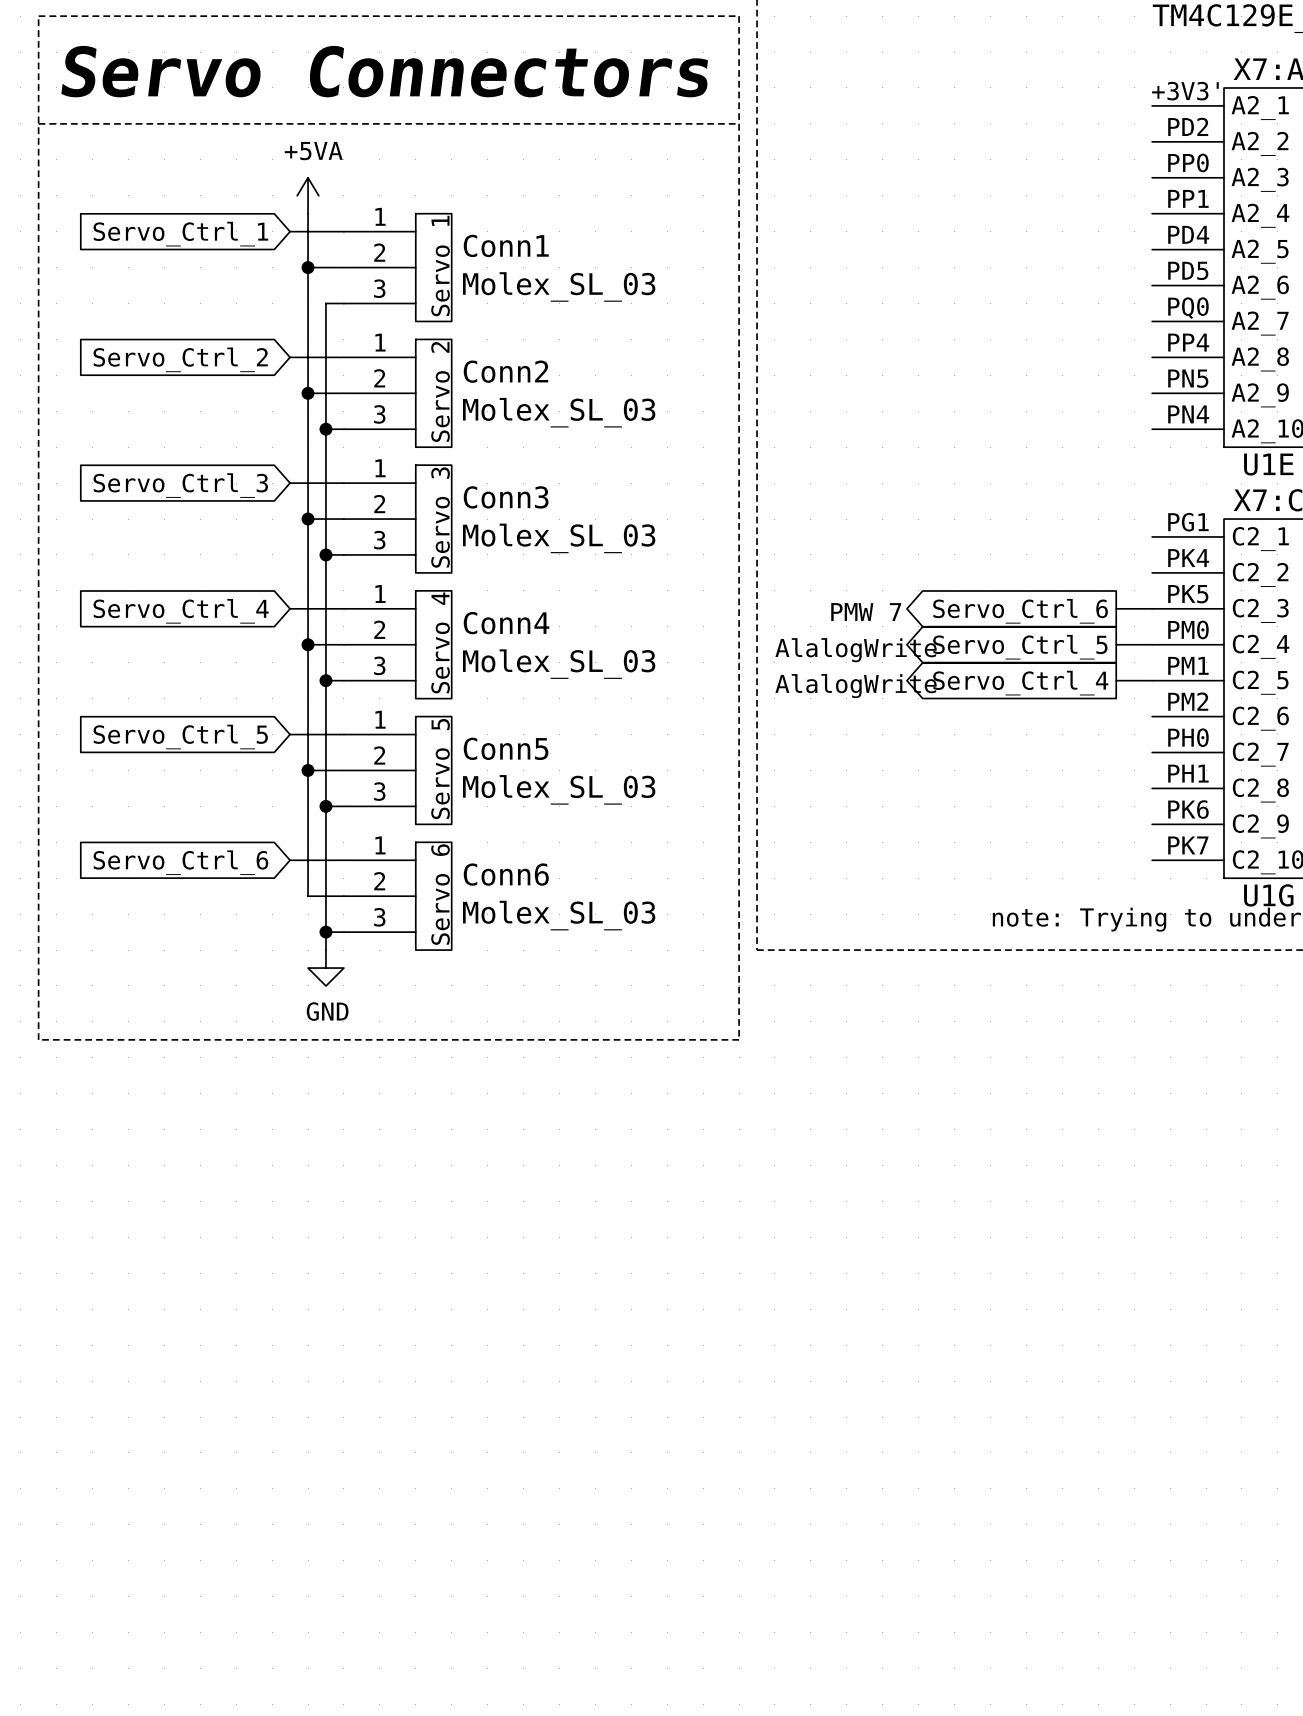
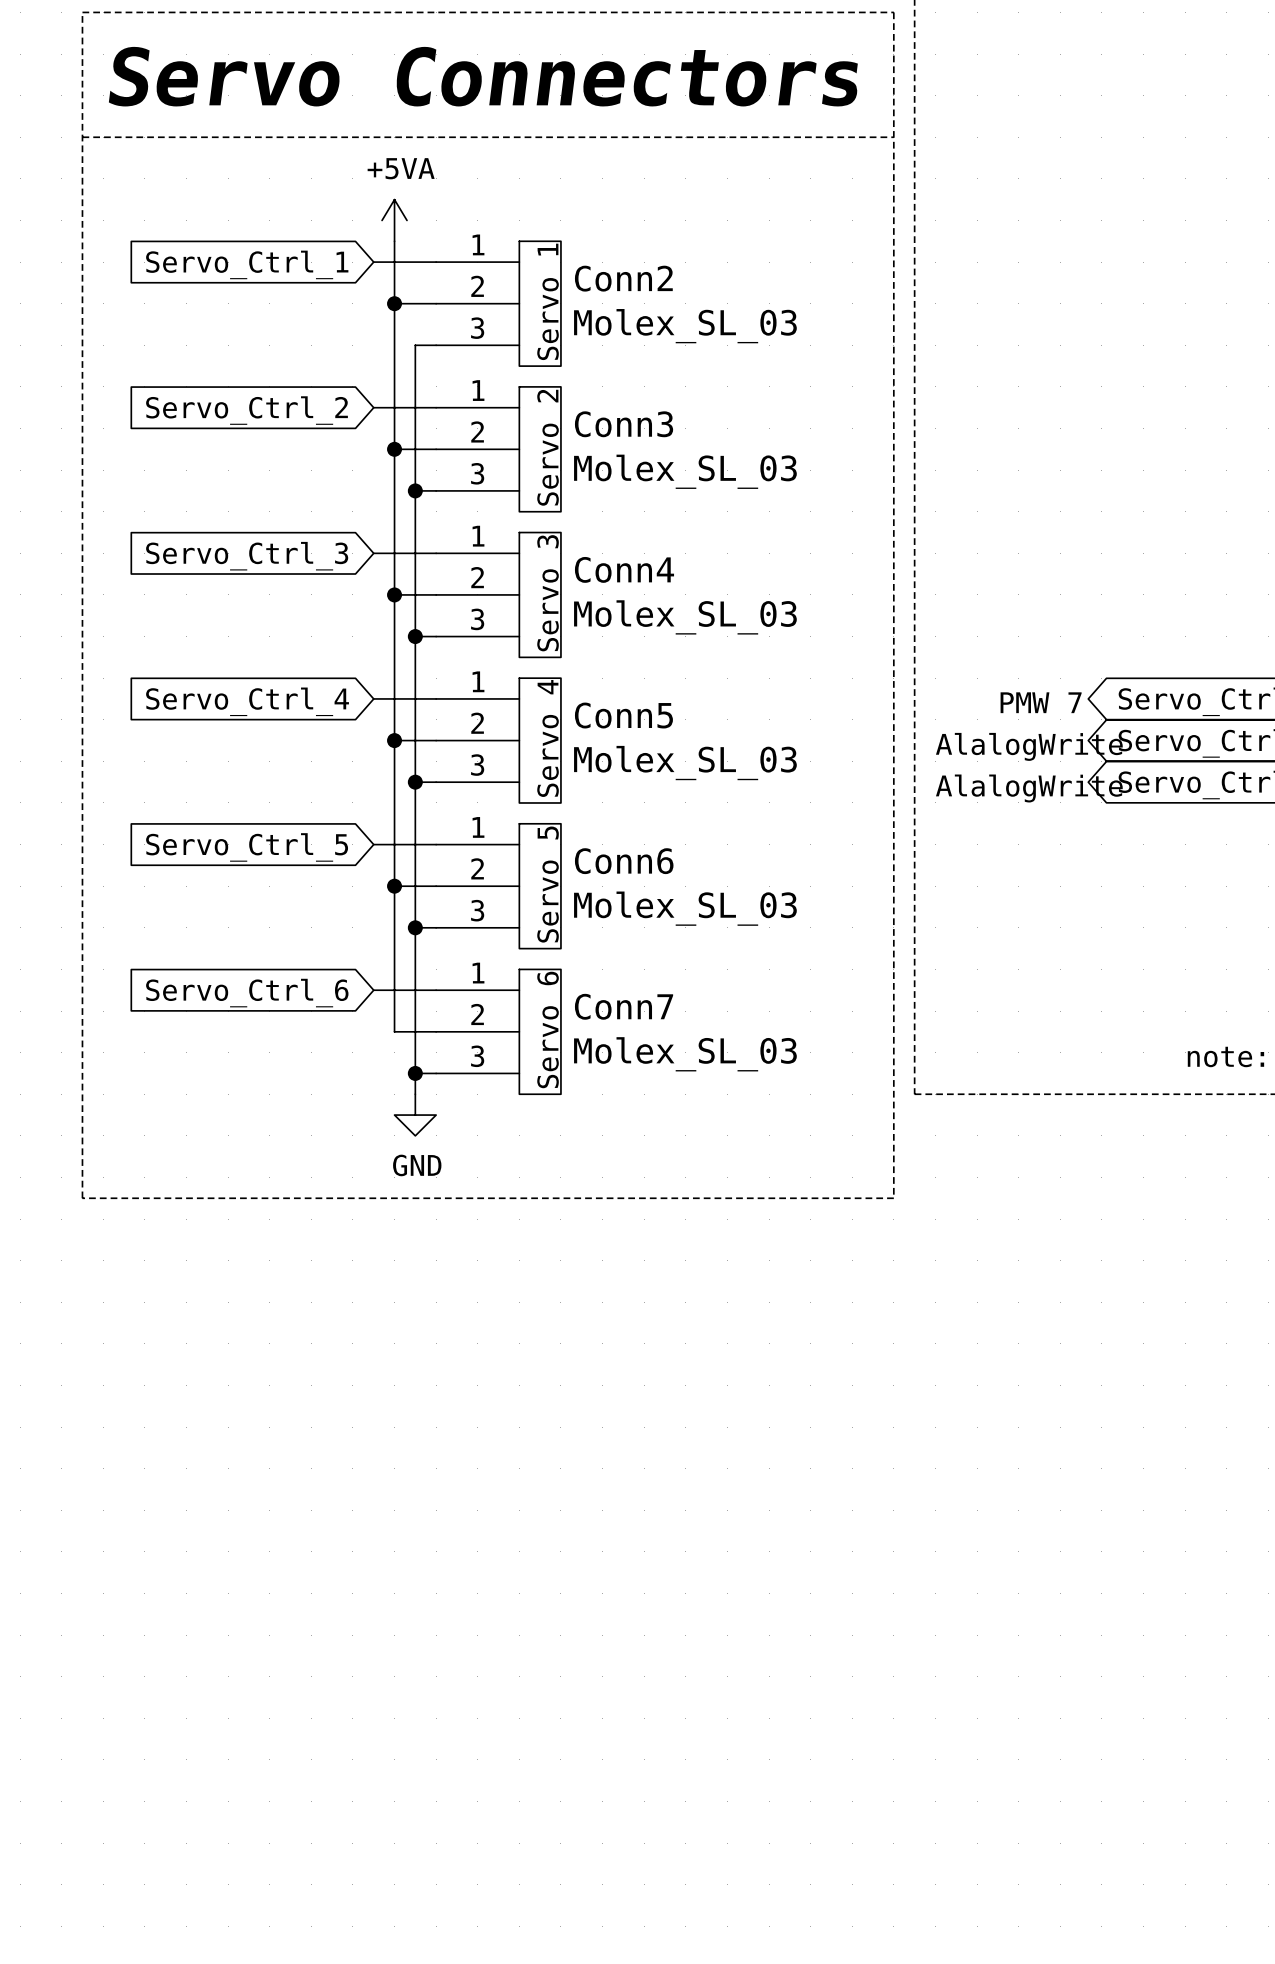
Conn1 name: Conn1 (506, 245) -> Conn2 (623, 278)
Conn2 name: Conn2 (505, 371) -> Conn3 (624, 424)
Conn3 name: Conn3 (506, 497) -> Conn4 (624, 569)
Conn4 name: Conn4 (506, 623) -> Conn5 (623, 715)
Conn5 name: Conn5 (506, 748) -> Conn6 (624, 861)
Conn6 name: Conn6 (506, 874) -> Conn7 (624, 1006)

